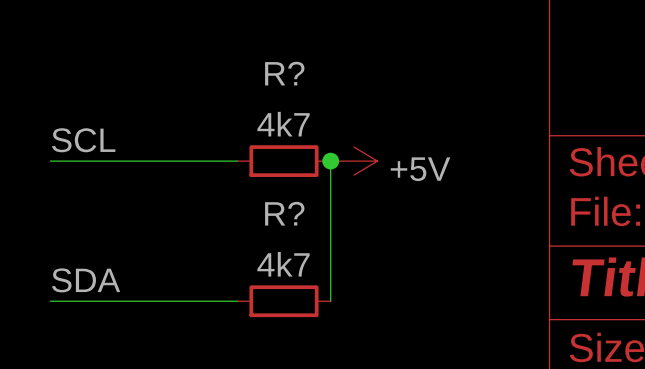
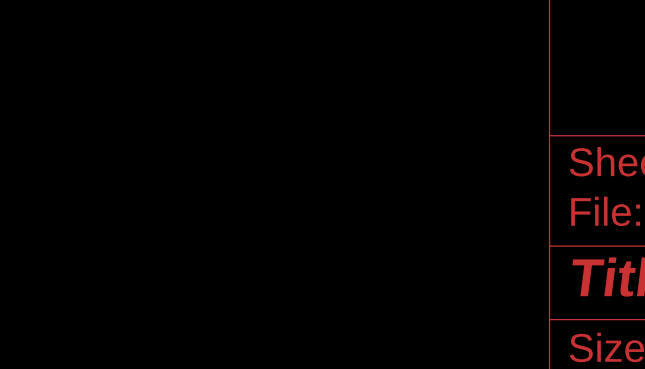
label: SCL (83, 140) -> none
wire: (50, 161) (237, 161) -> none
R?: 4k7 (283, 161) -> none
wire: (330, 161) (330, 301) -> none
junction: (330, 161) -> none
power symbol: +5V (354, 161) -> none
label: SDA (86, 280) -> none
wire: (50, 301) (237, 301) -> none
R?: 4k7 (283, 301) -> none

